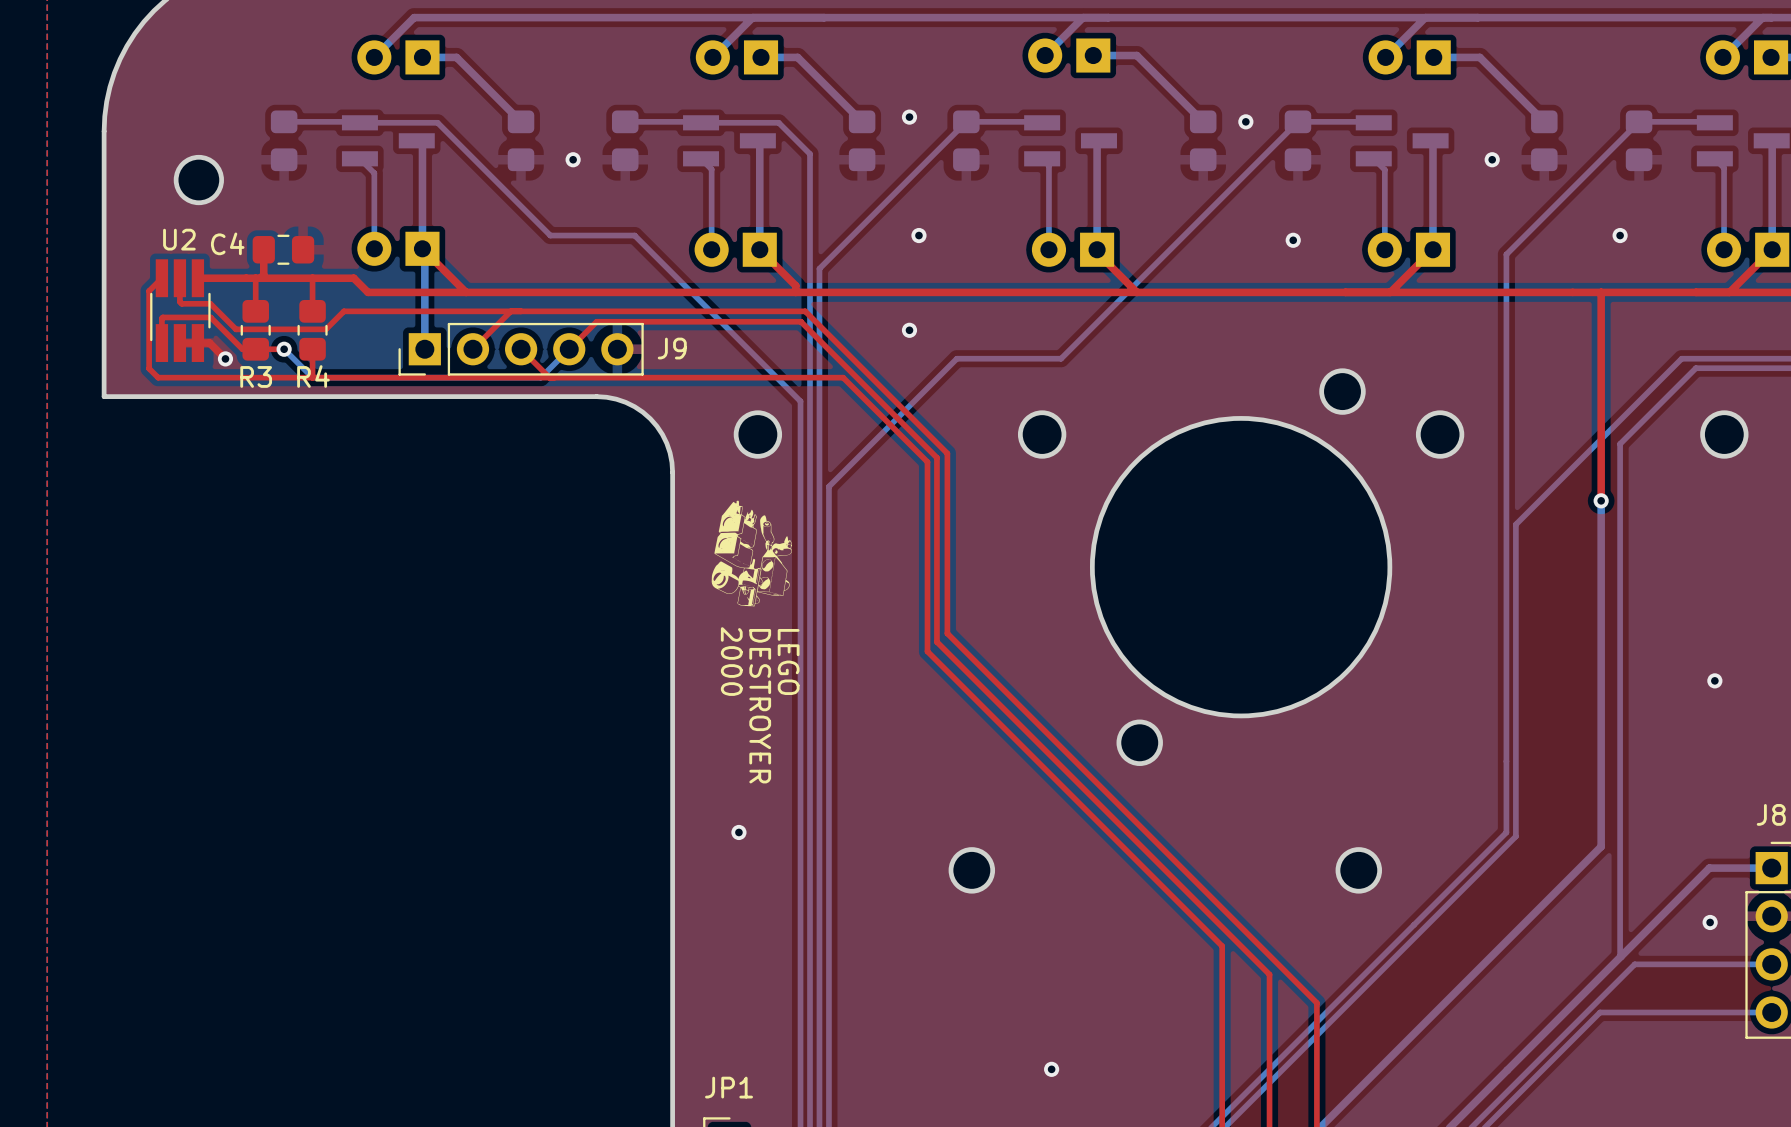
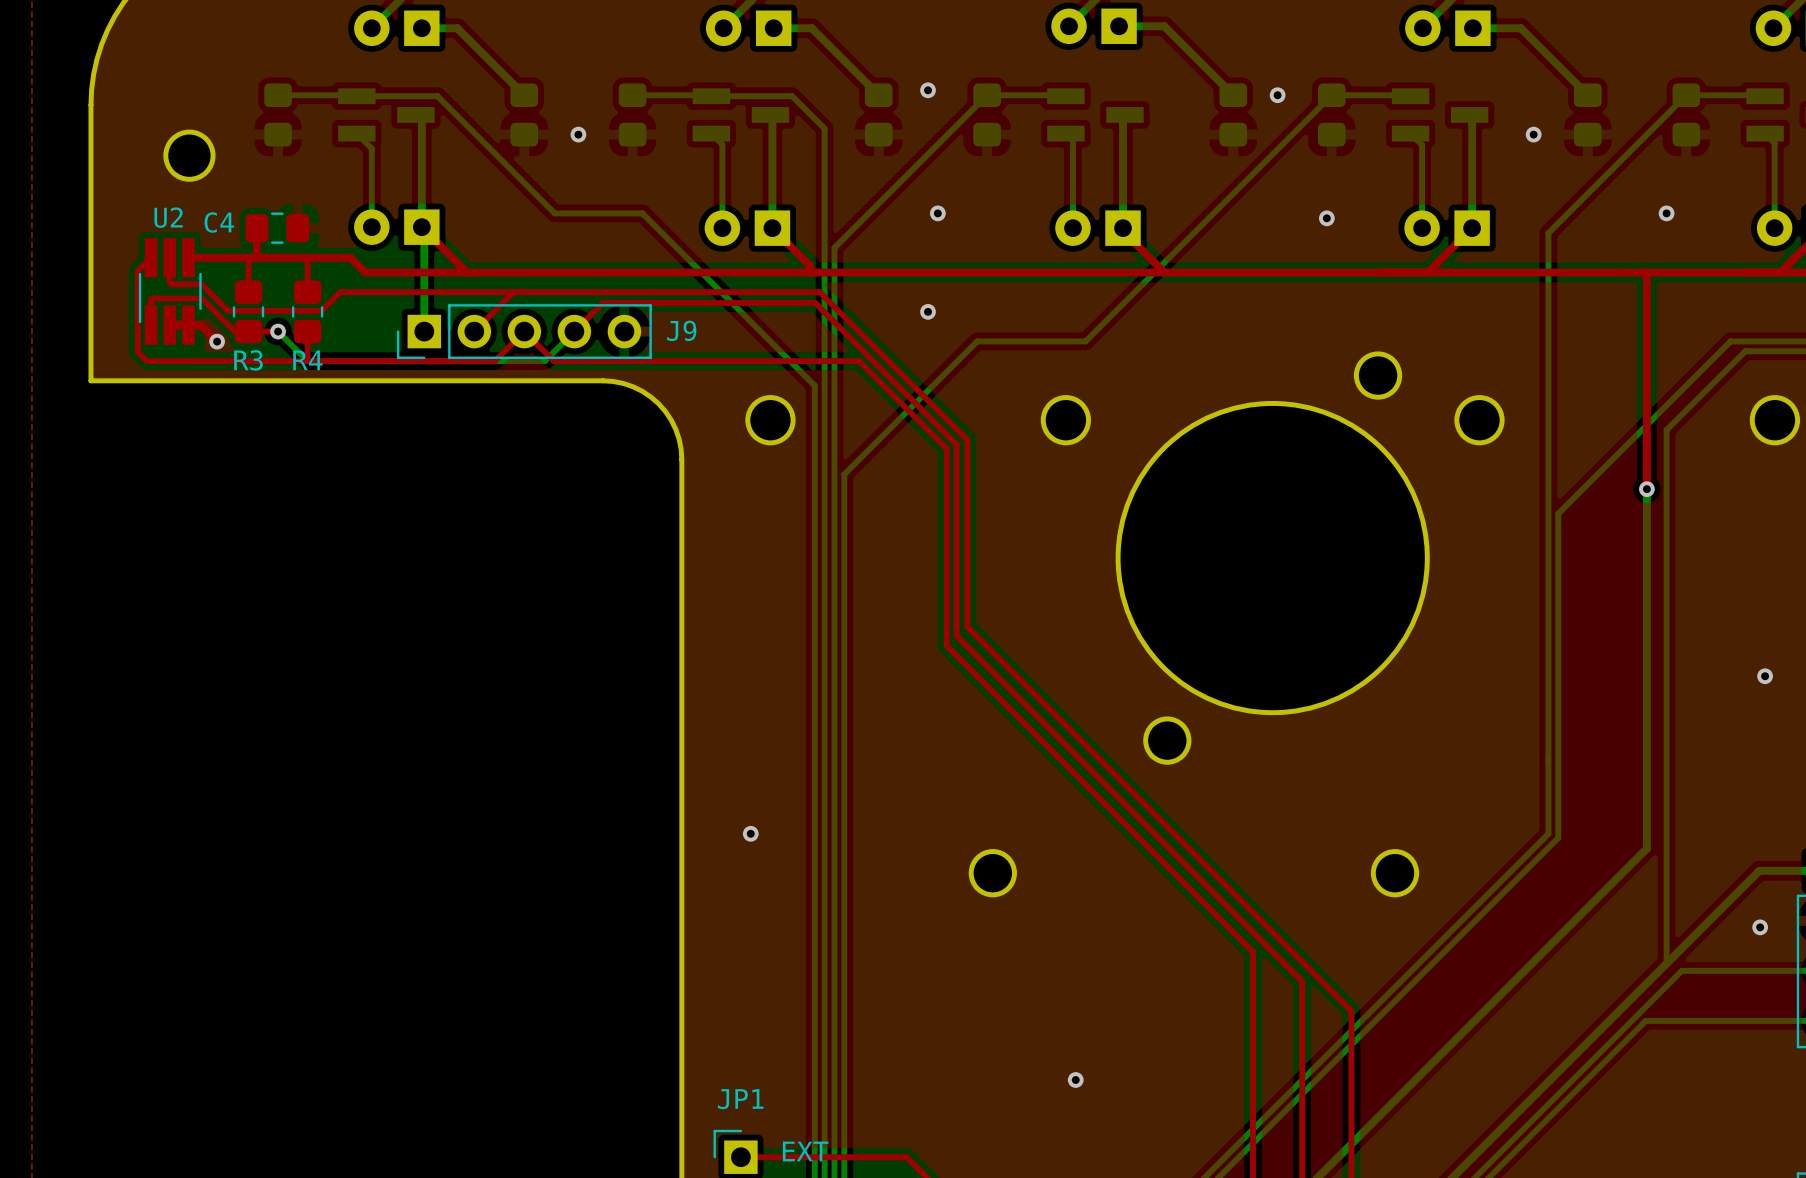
top track: (492, 377) (549, 377) -> (494, 361) (524, 331)
drawing: [711, 500, 792, 607] -> none

